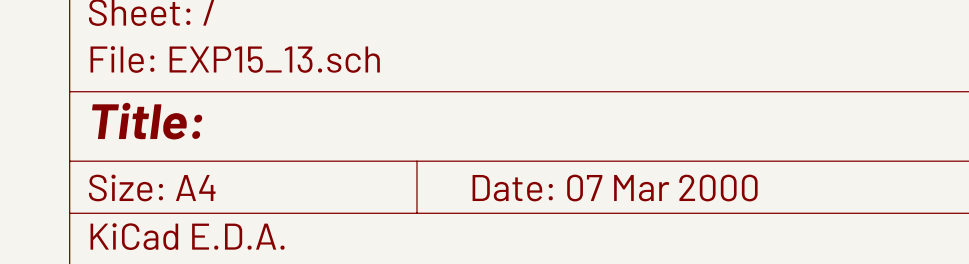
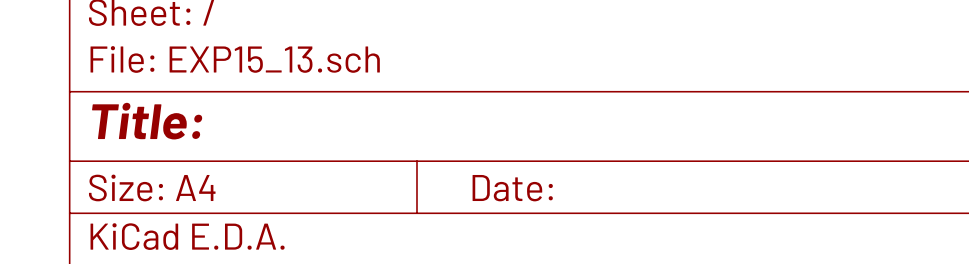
title block: Date: 07 Mar 2000 (615, 188) -> Date: (512, 188)

